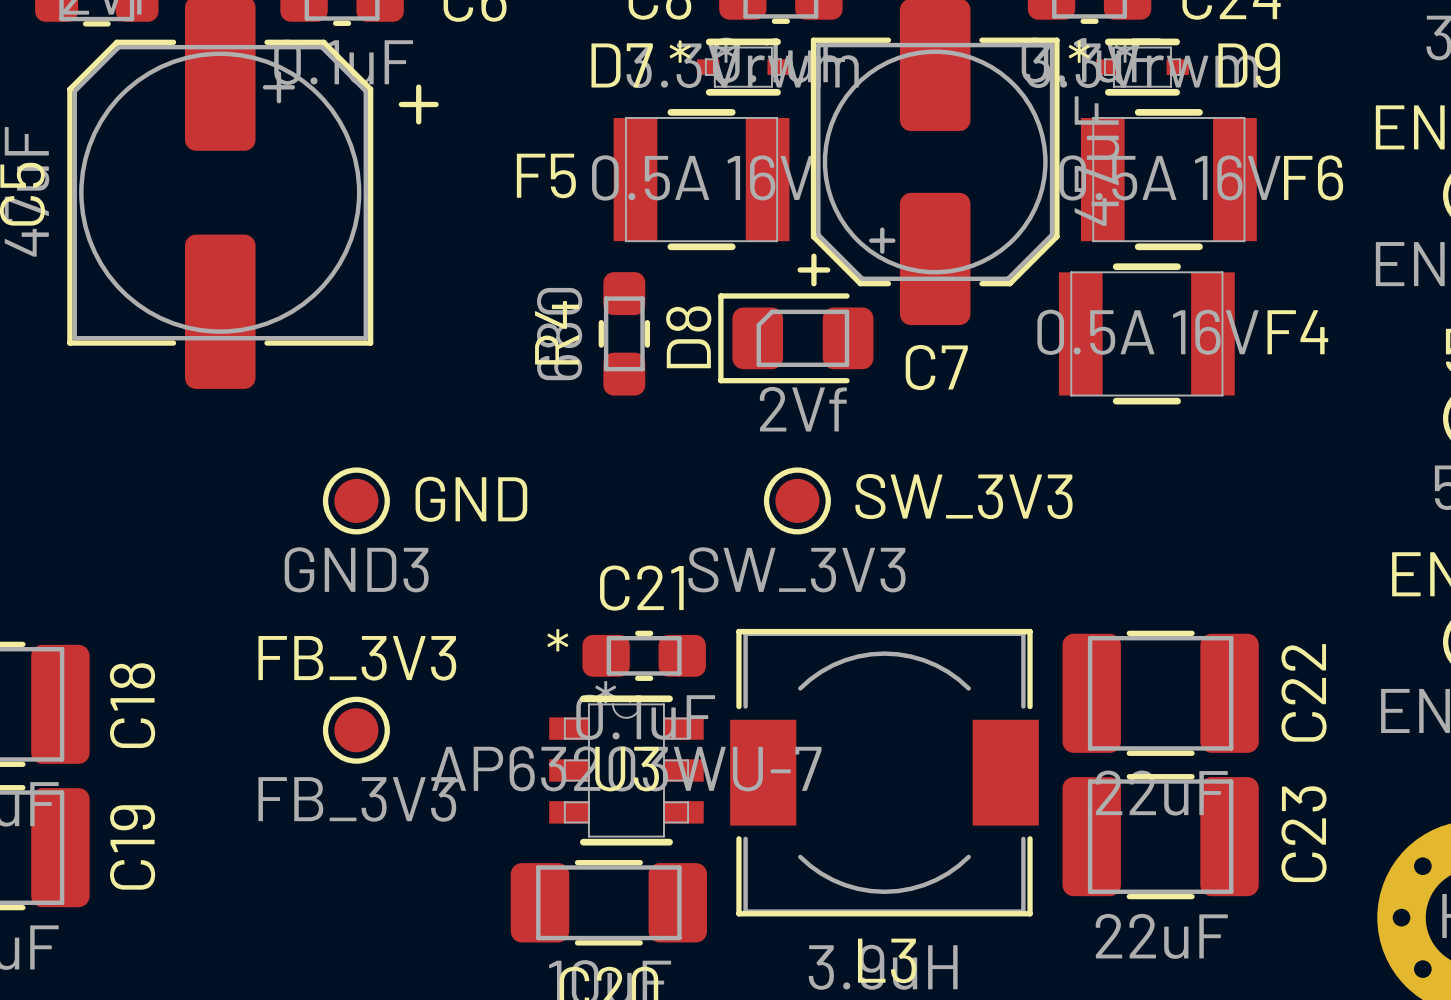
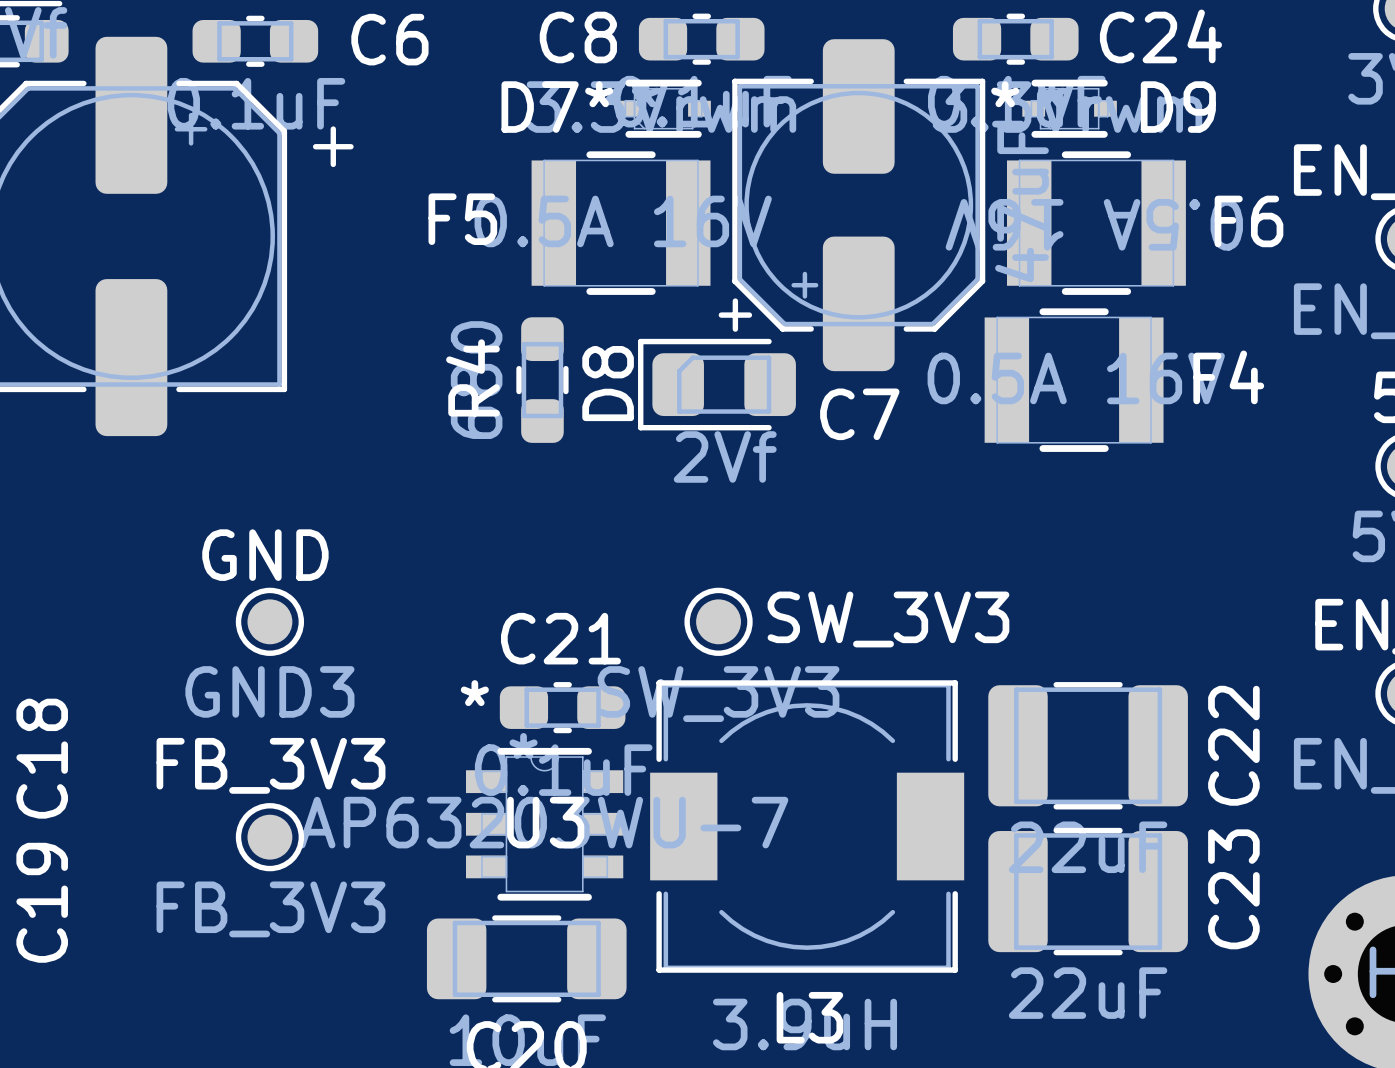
F6 rotation: 0° (1168, 179) -> 180° (1096, 223)
GND3 value position: GND (471, 499) -> GND (265, 555)
GND3 position: (356, 500) -> (269, 621)
SW_3V3 position: (797, 500) -> (718, 621)
FB_3V3 position: (356, 730) -> (269, 837)

